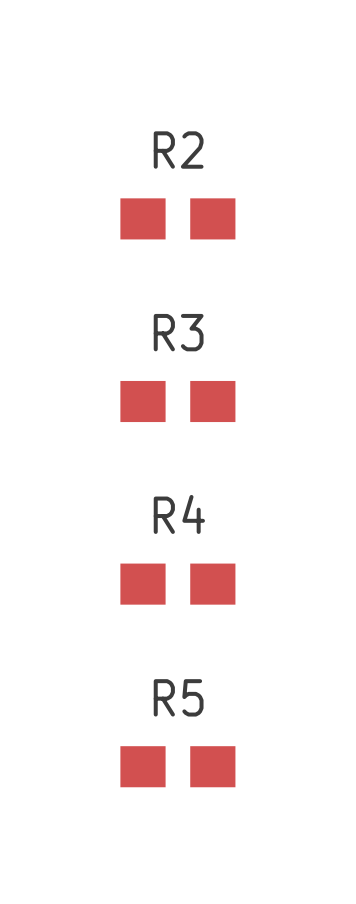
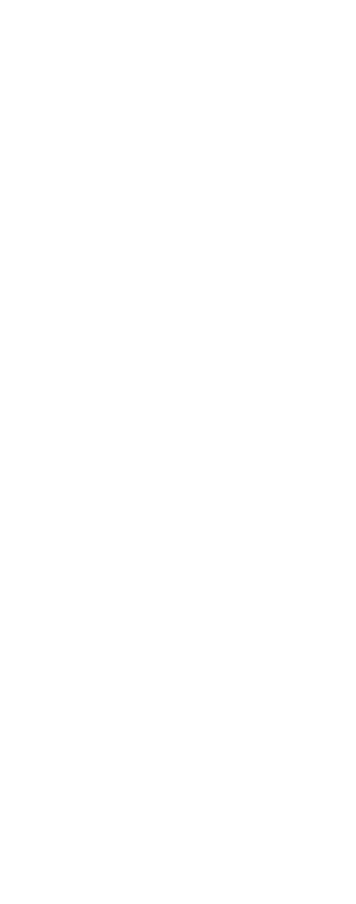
R2: (177, 218) -> none
R3: (177, 401) -> none
R4: (177, 584) -> none
R5: (177, 766) -> none

